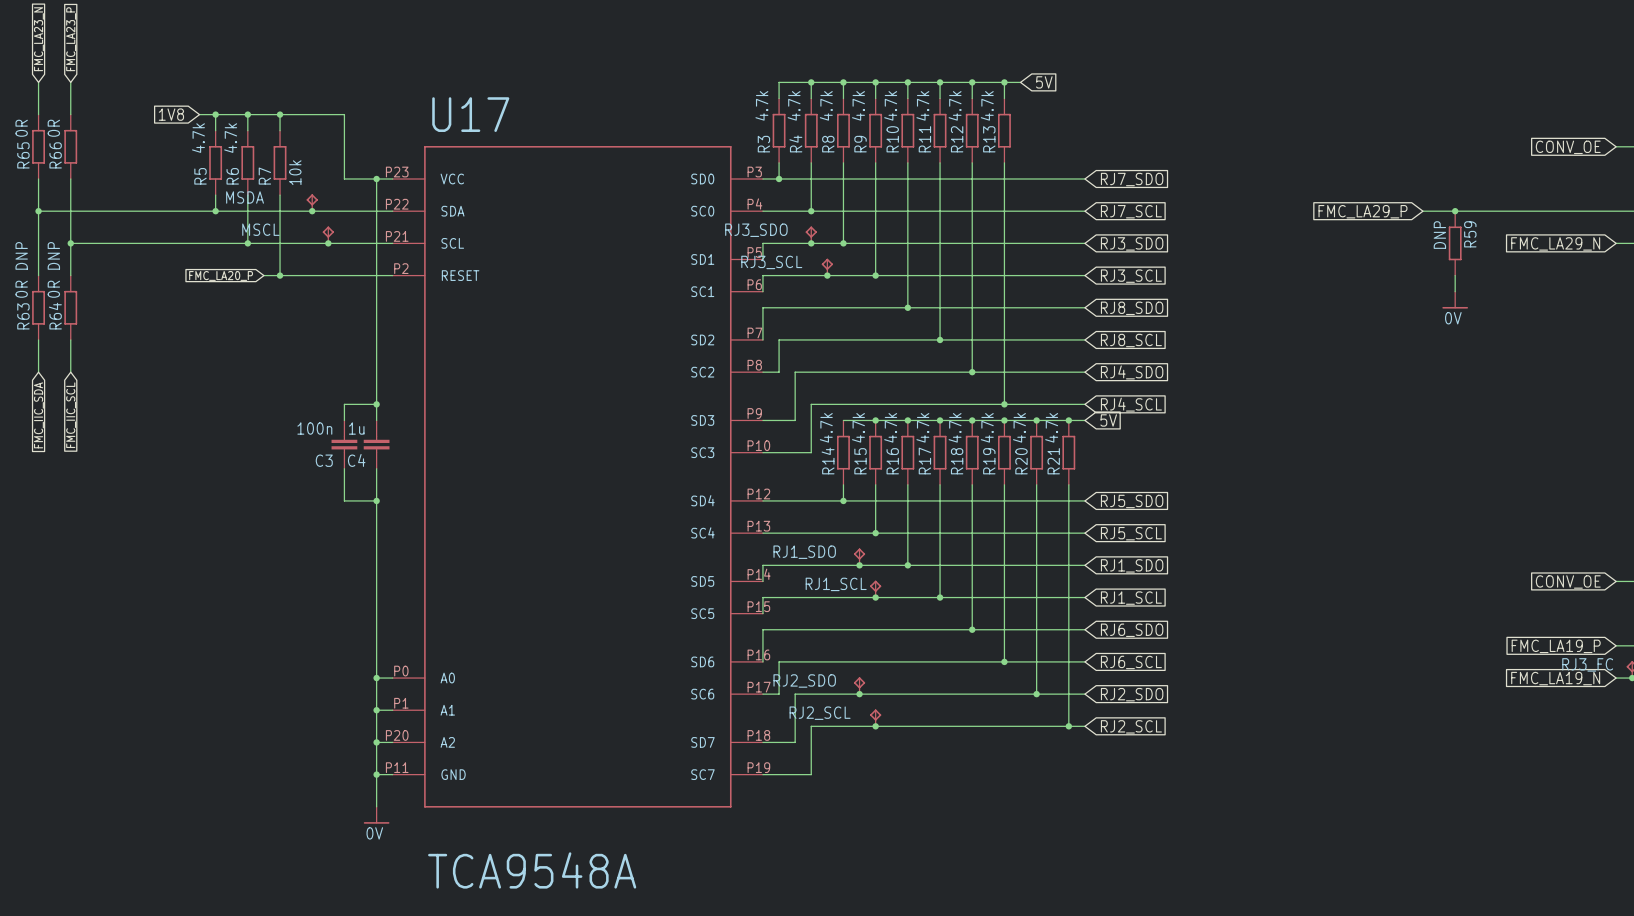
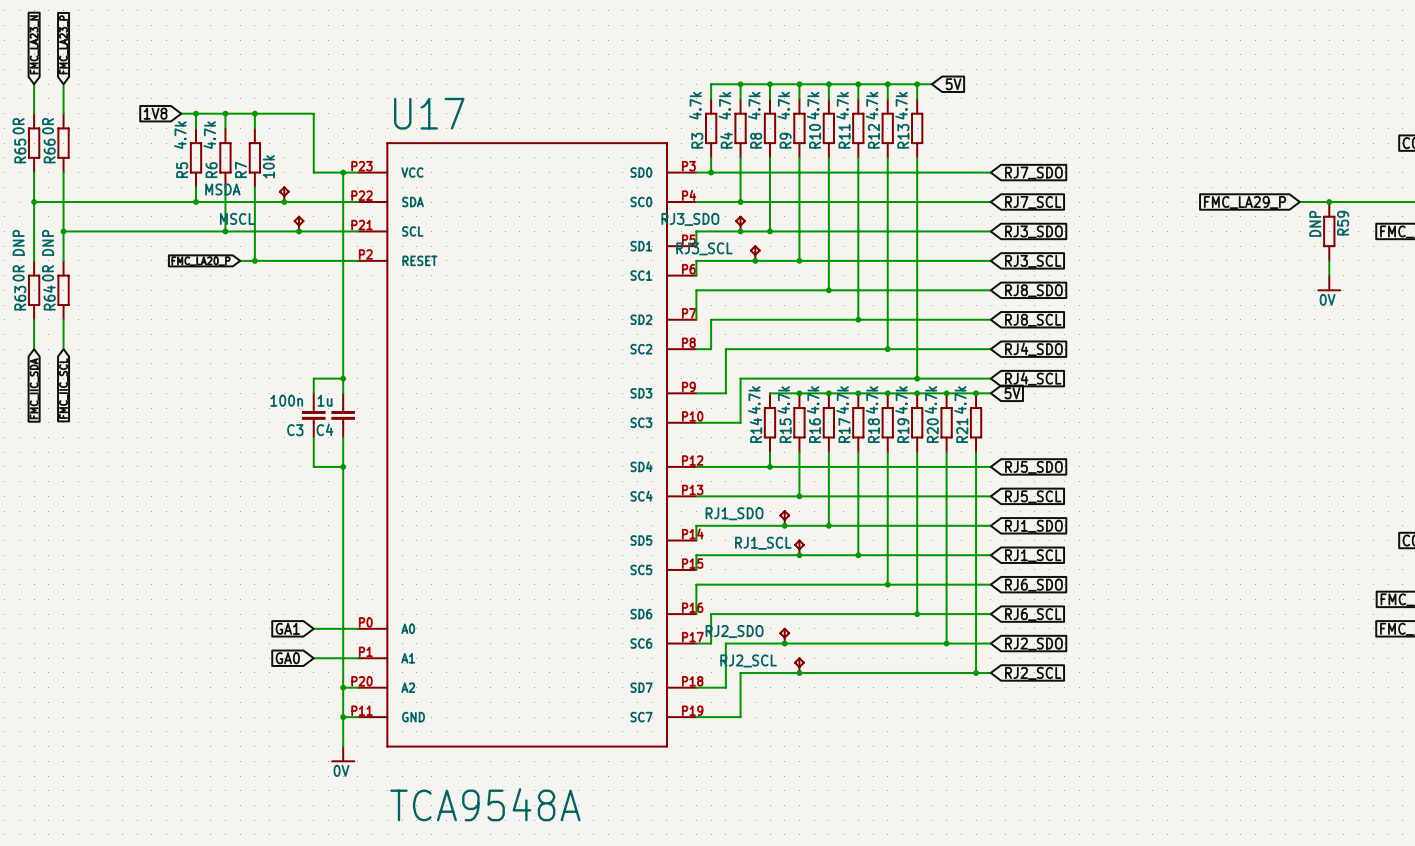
global label: none -> GA1 (287, 628)
wire: none -> (313, 628) (343, 628)
junction: (376, 678) -> none
global label: none -> GA0 (287, 658)
wire: none -> (313, 658) (343, 658)
junction: (376, 710) -> none

